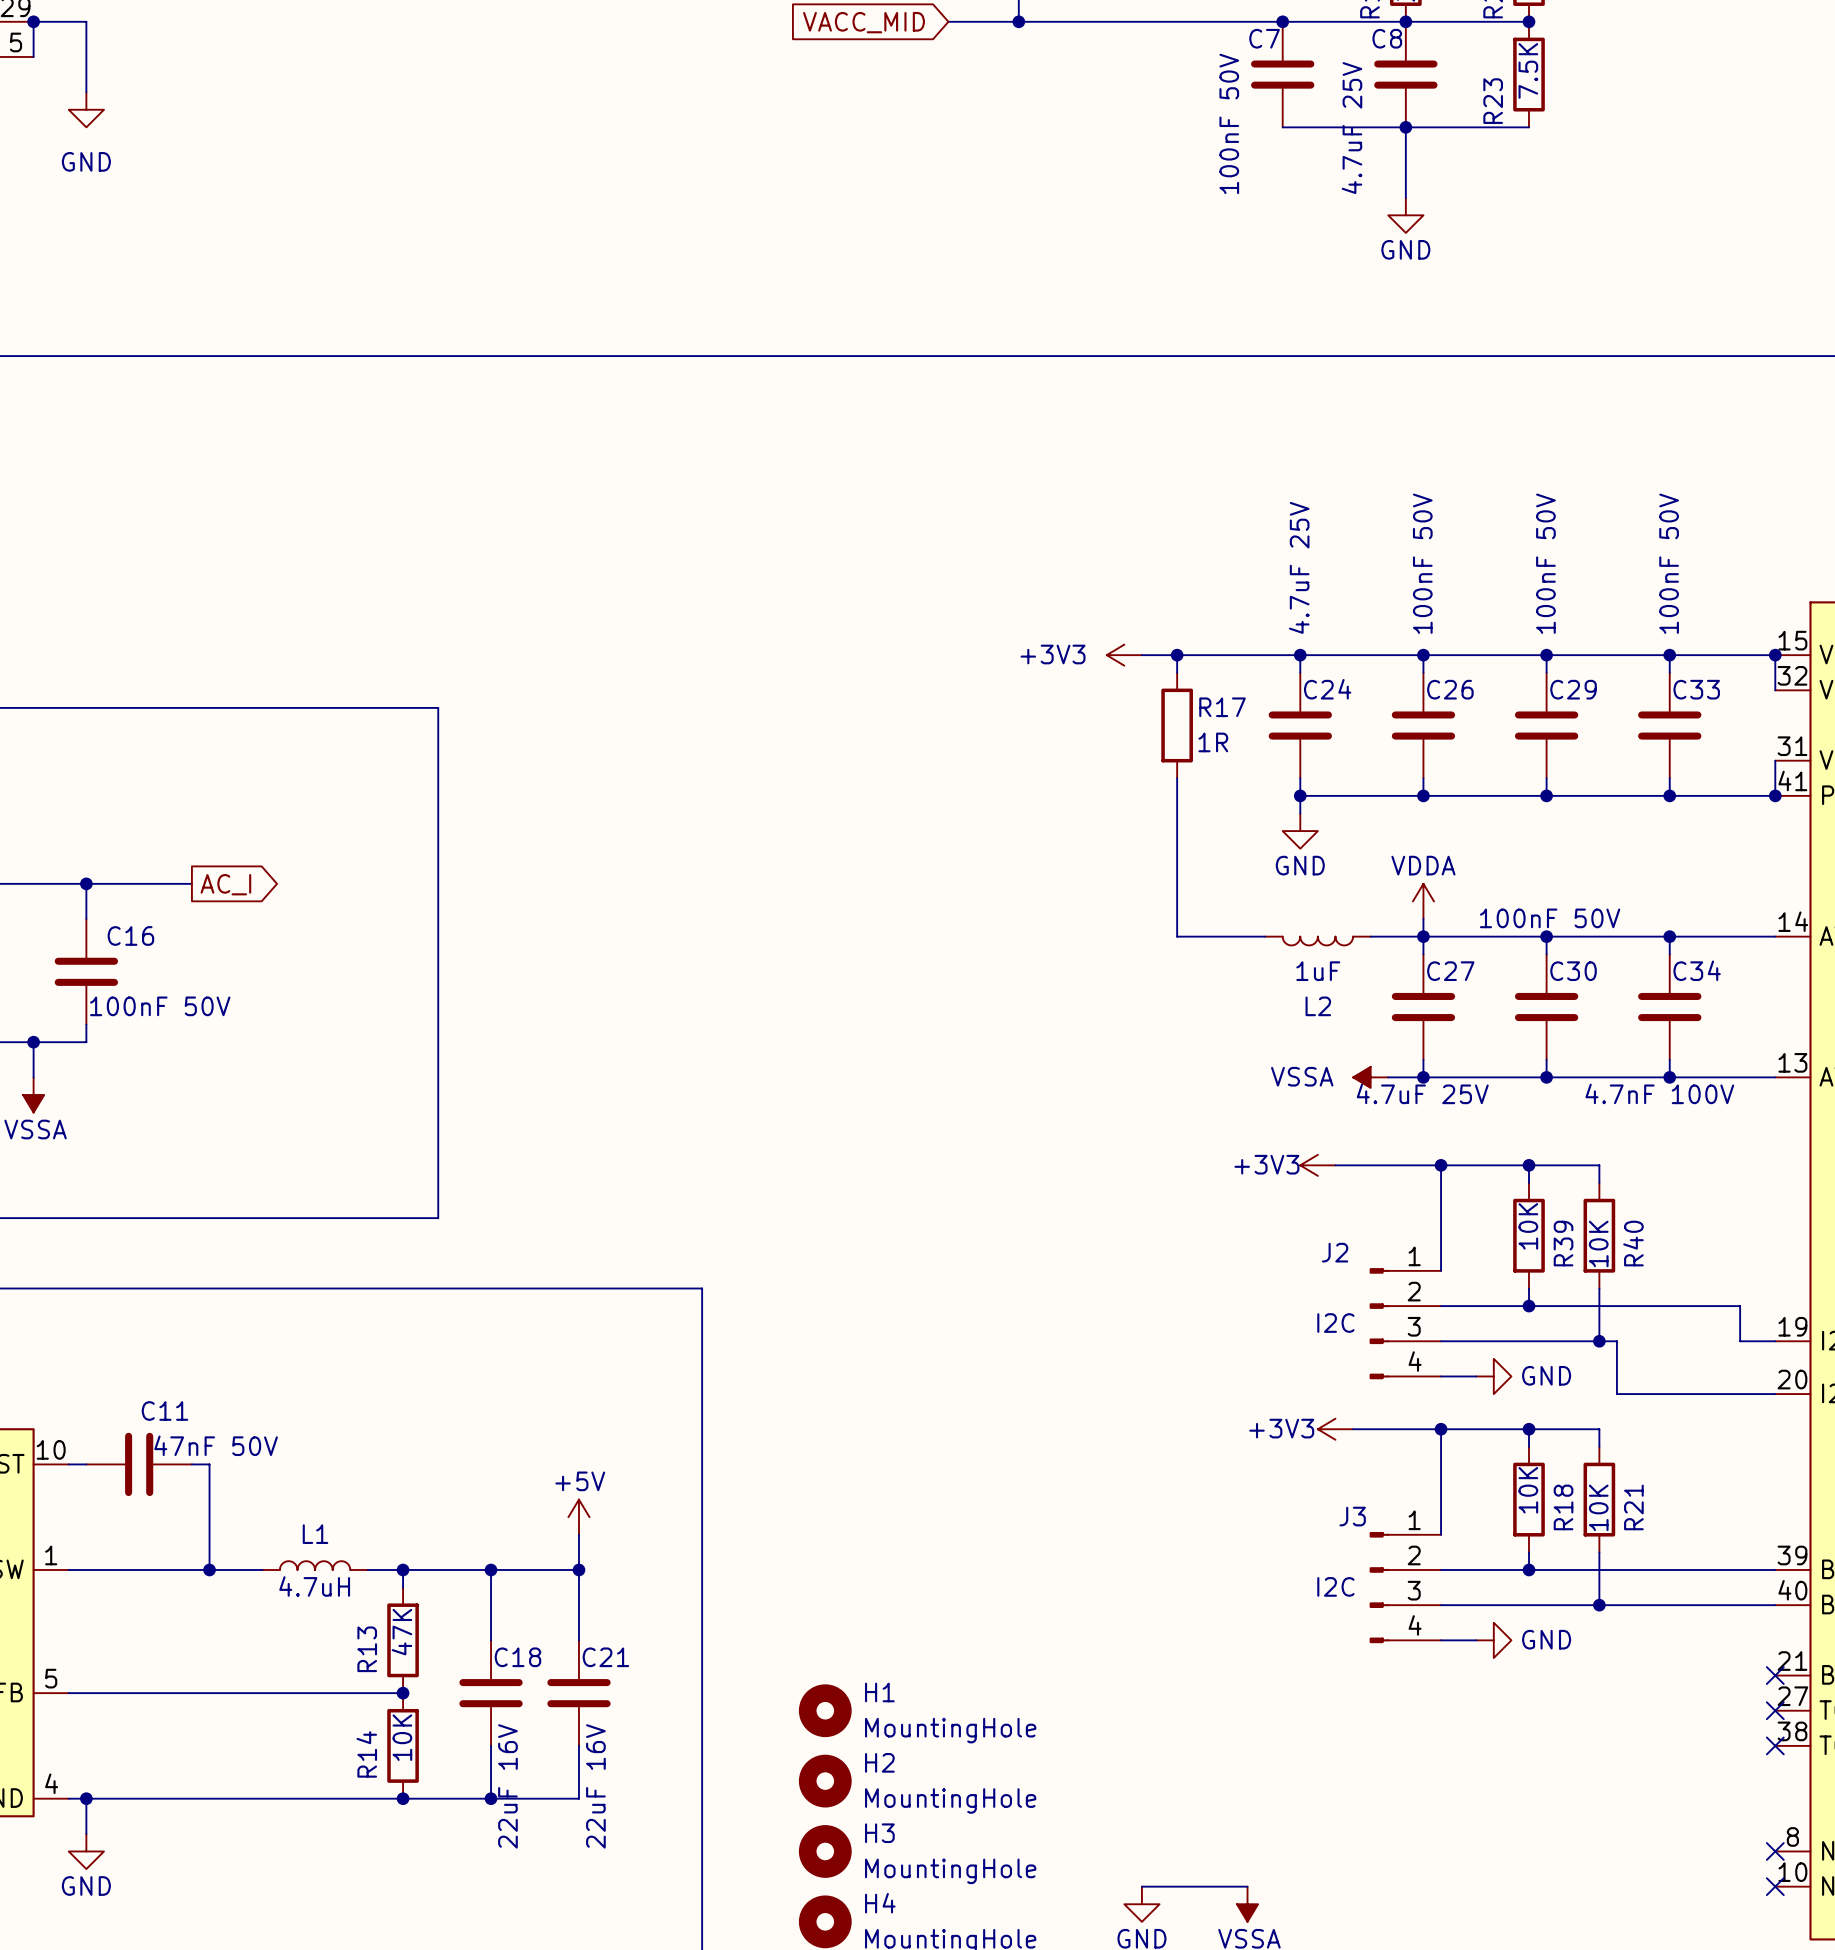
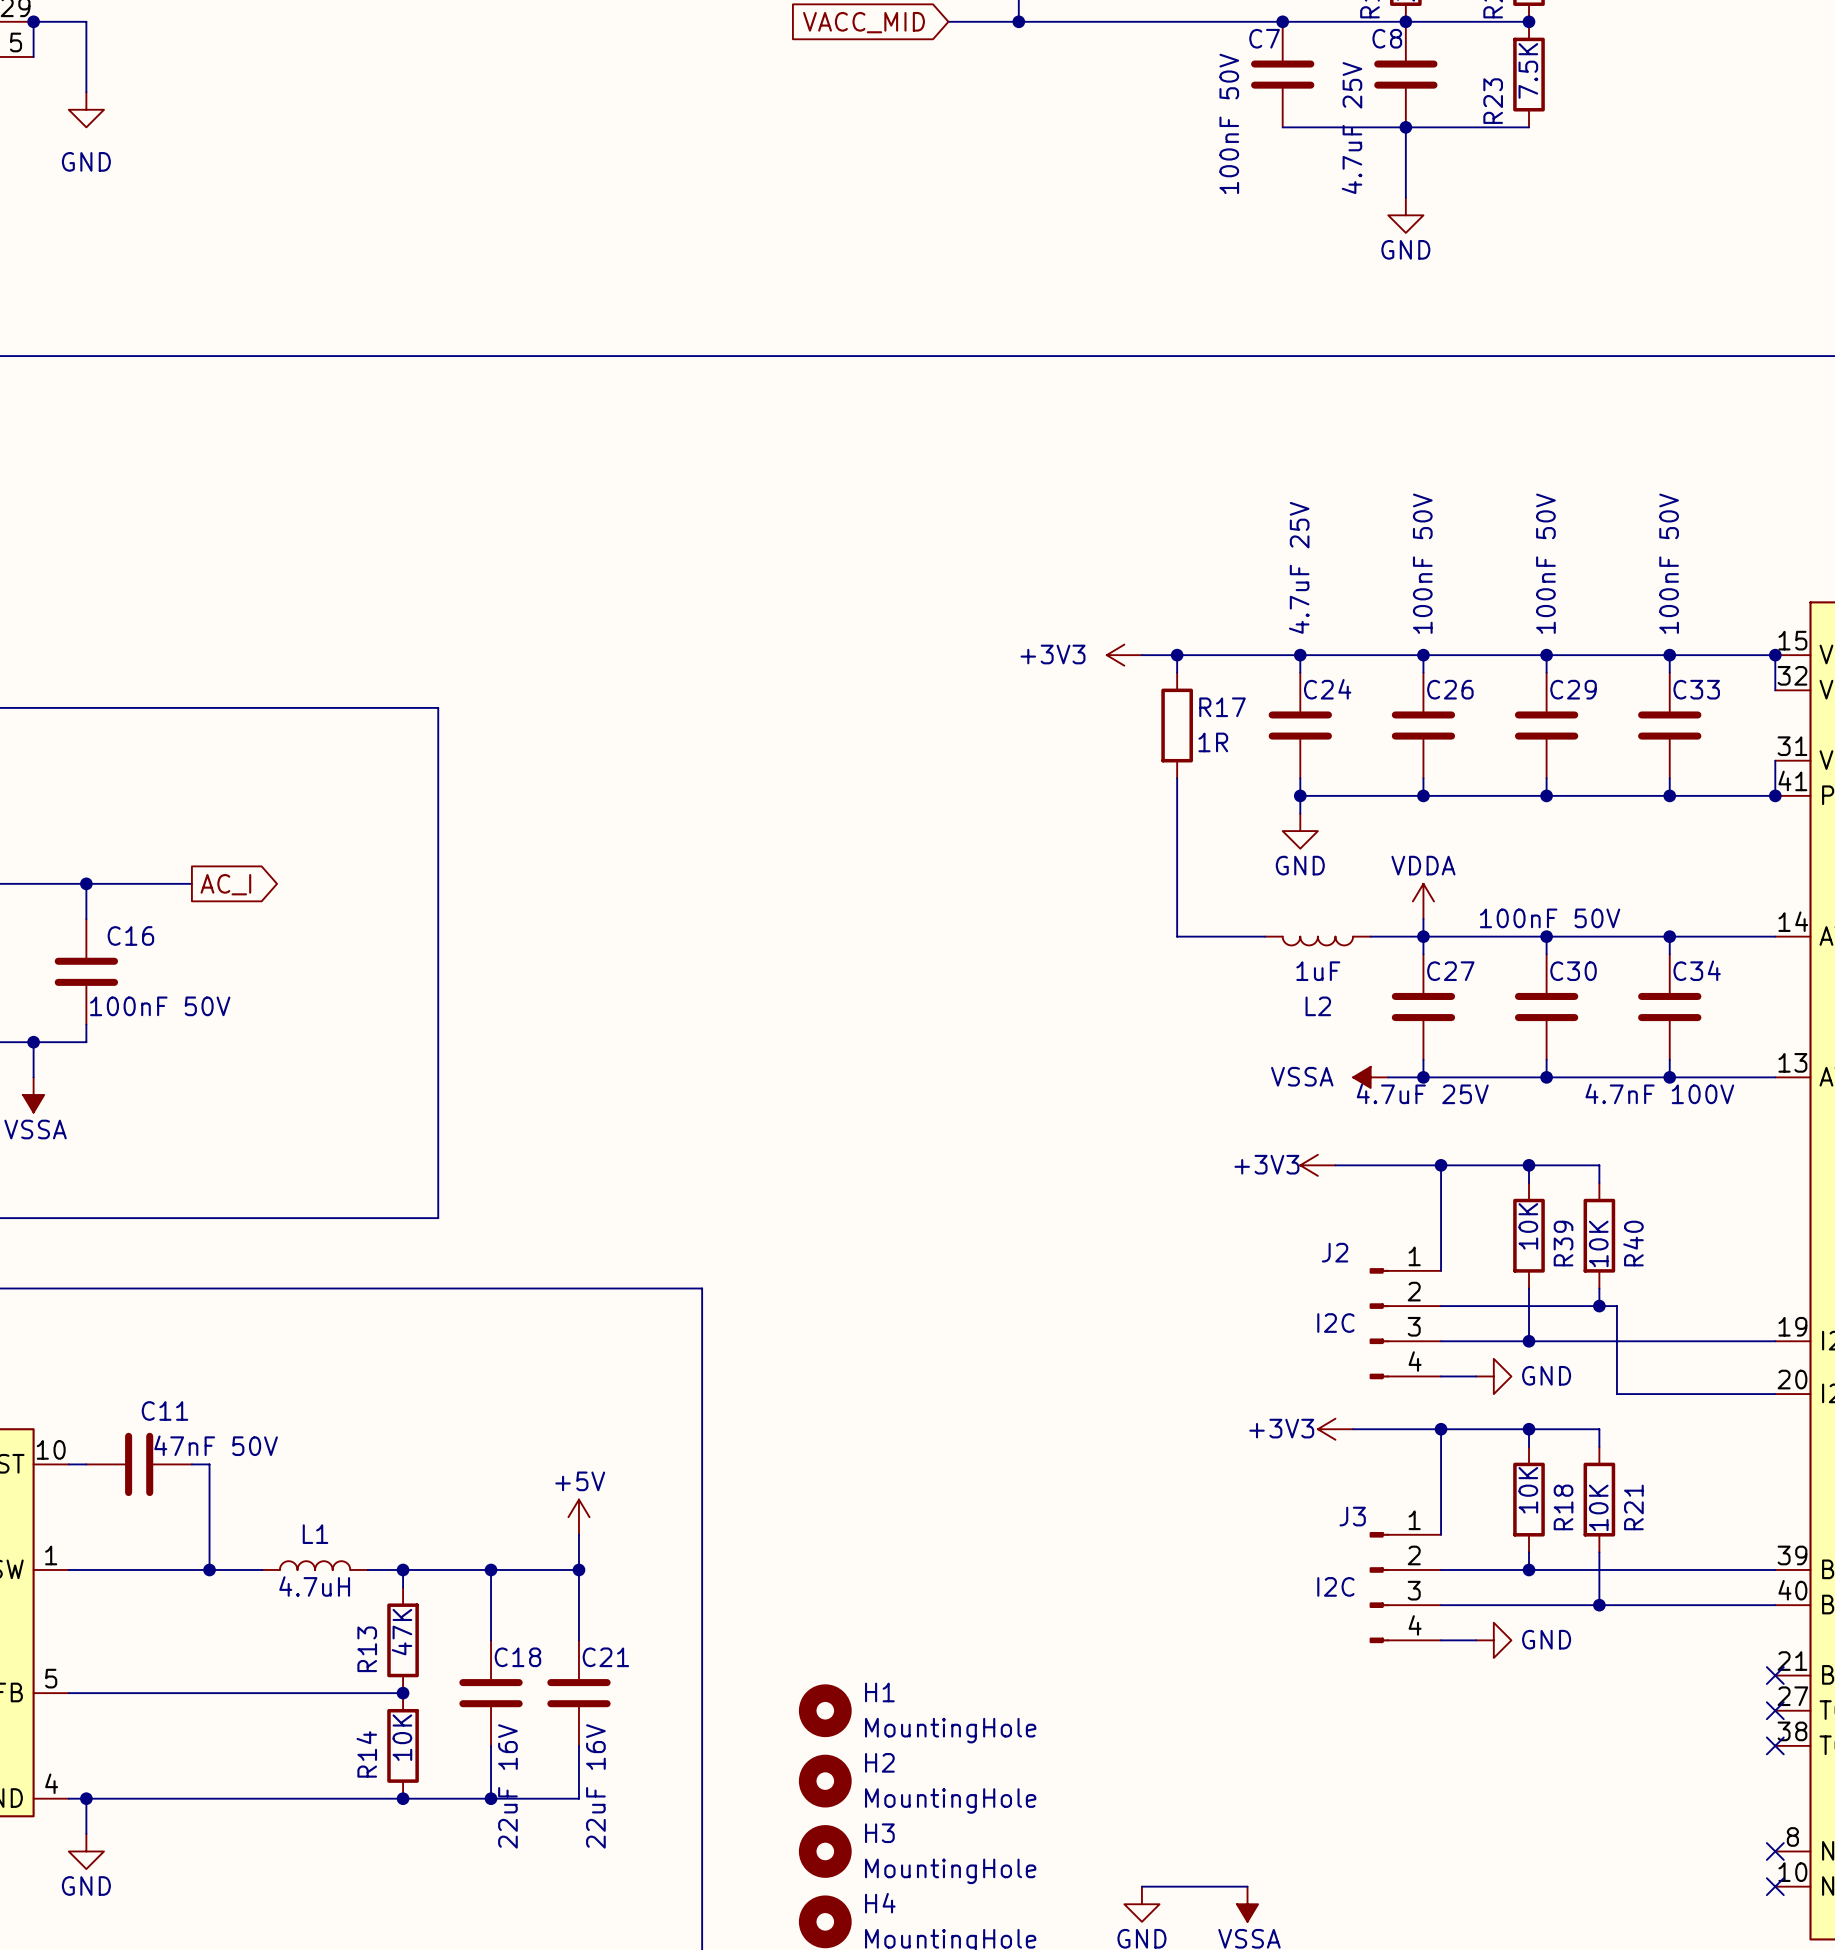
junction: (1529, 1306) -> none
wire: (1599, 1306) (1599, 1341) -> (1529, 1306) (1529, 1341)
junction: none -> (1599, 1306)
wire: (1616, 1306) (1740, 1306) (1740, 1341) -> (1616, 1306) (1616, 1341) (1740, 1341)
junction: none -> (1529, 1341)
junction: (1599, 1341) -> none

